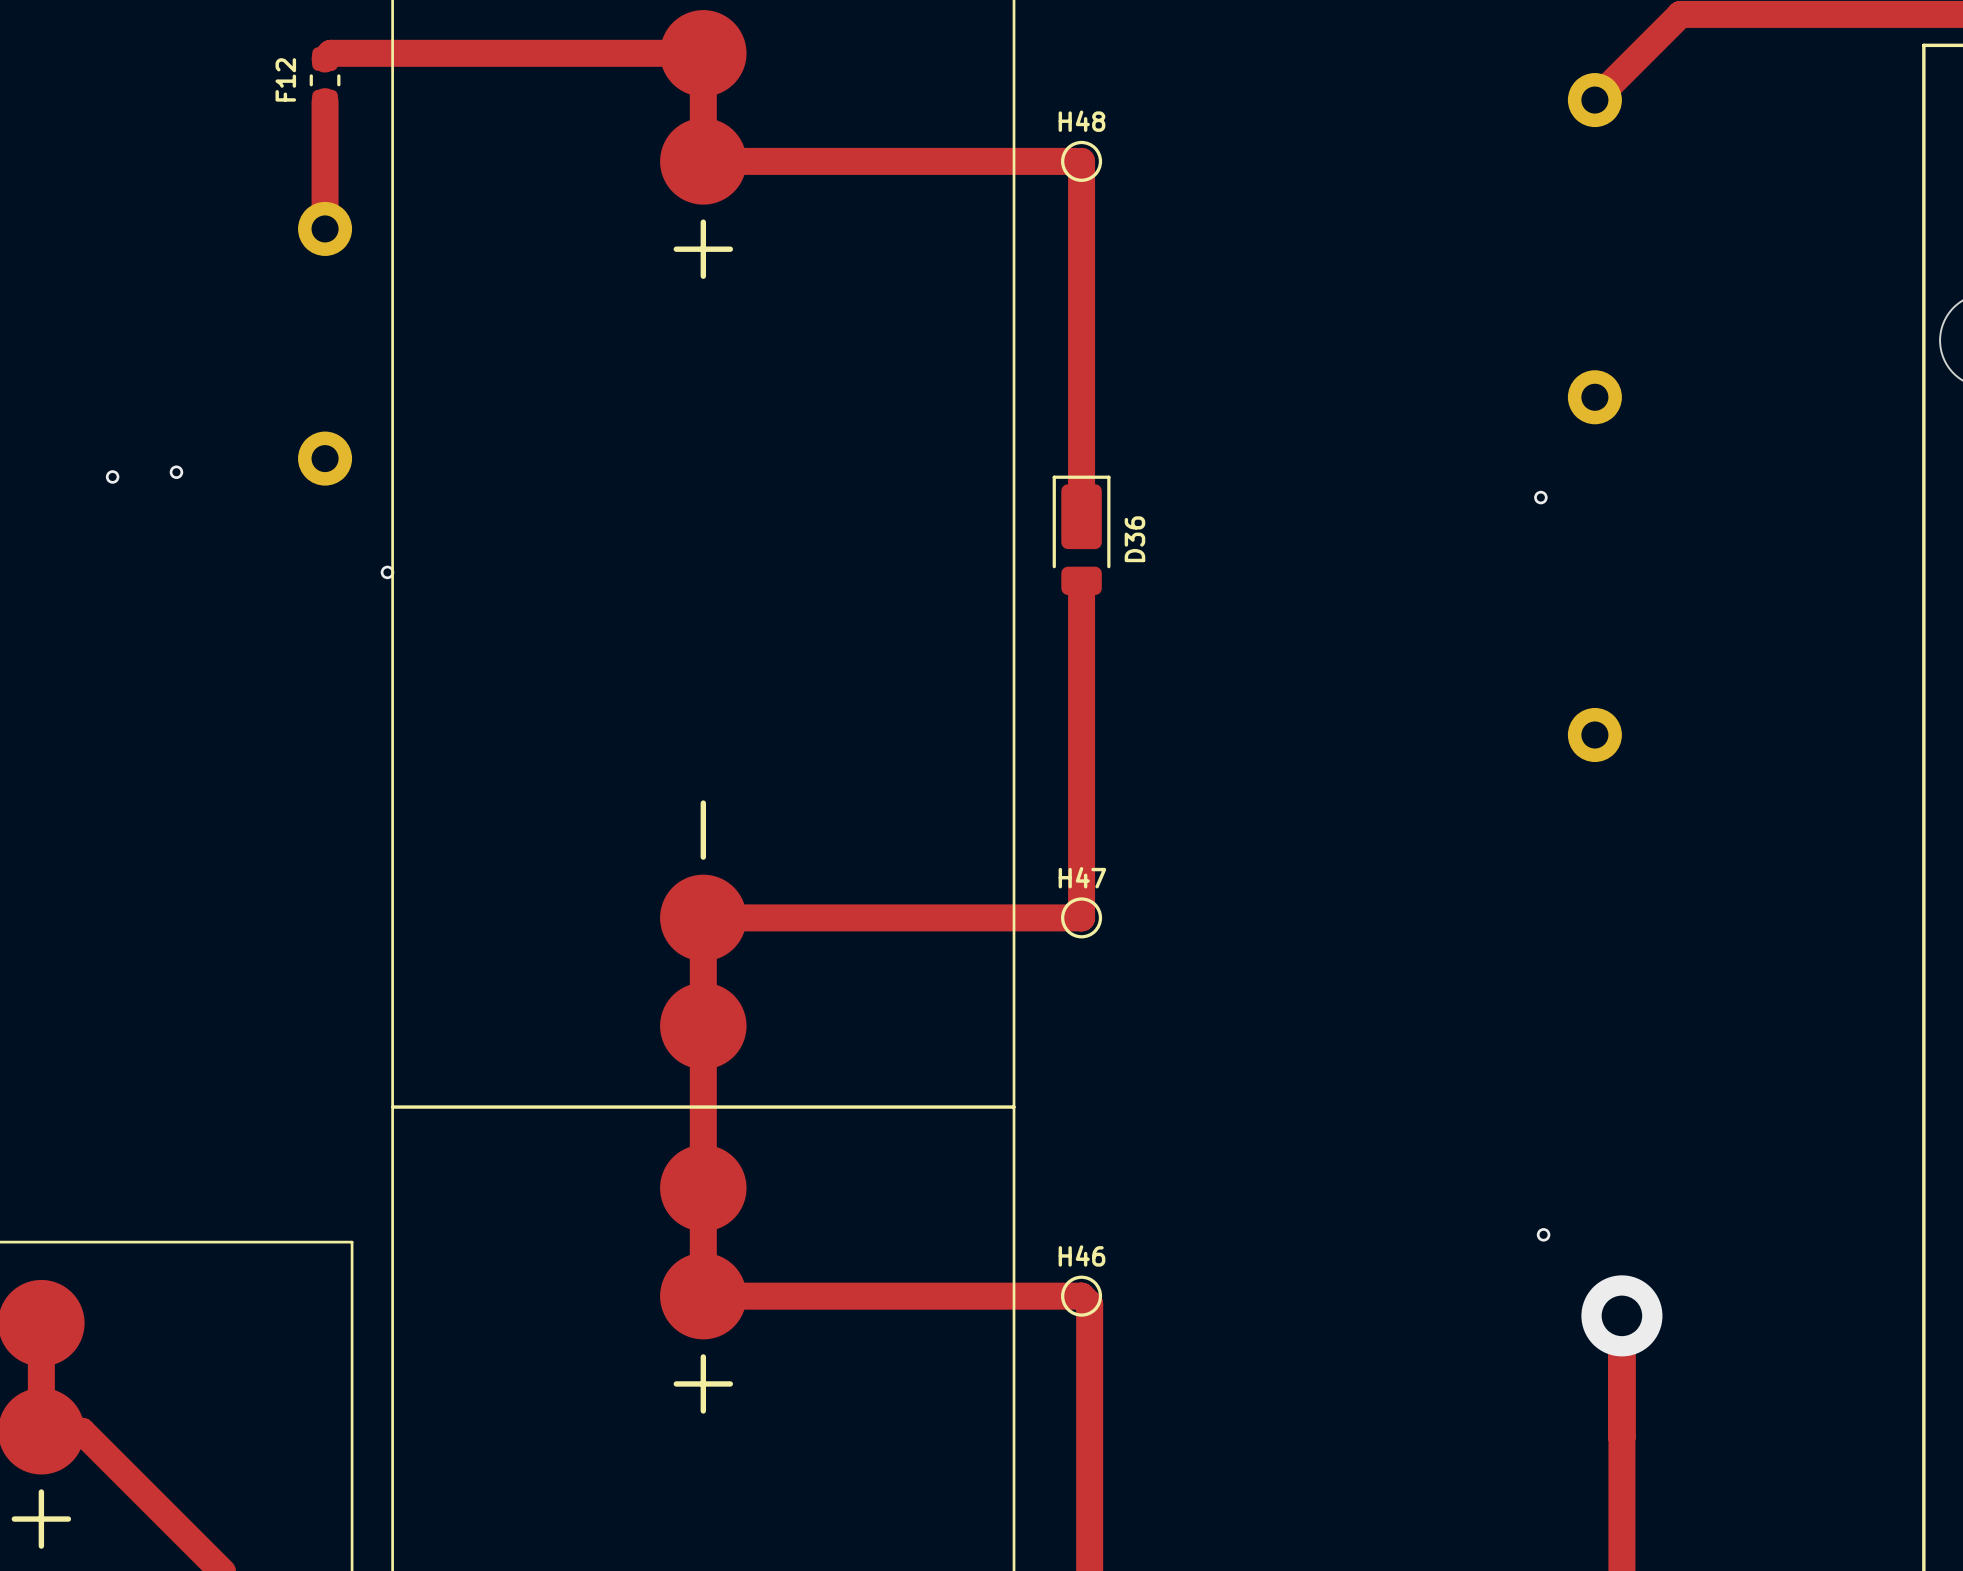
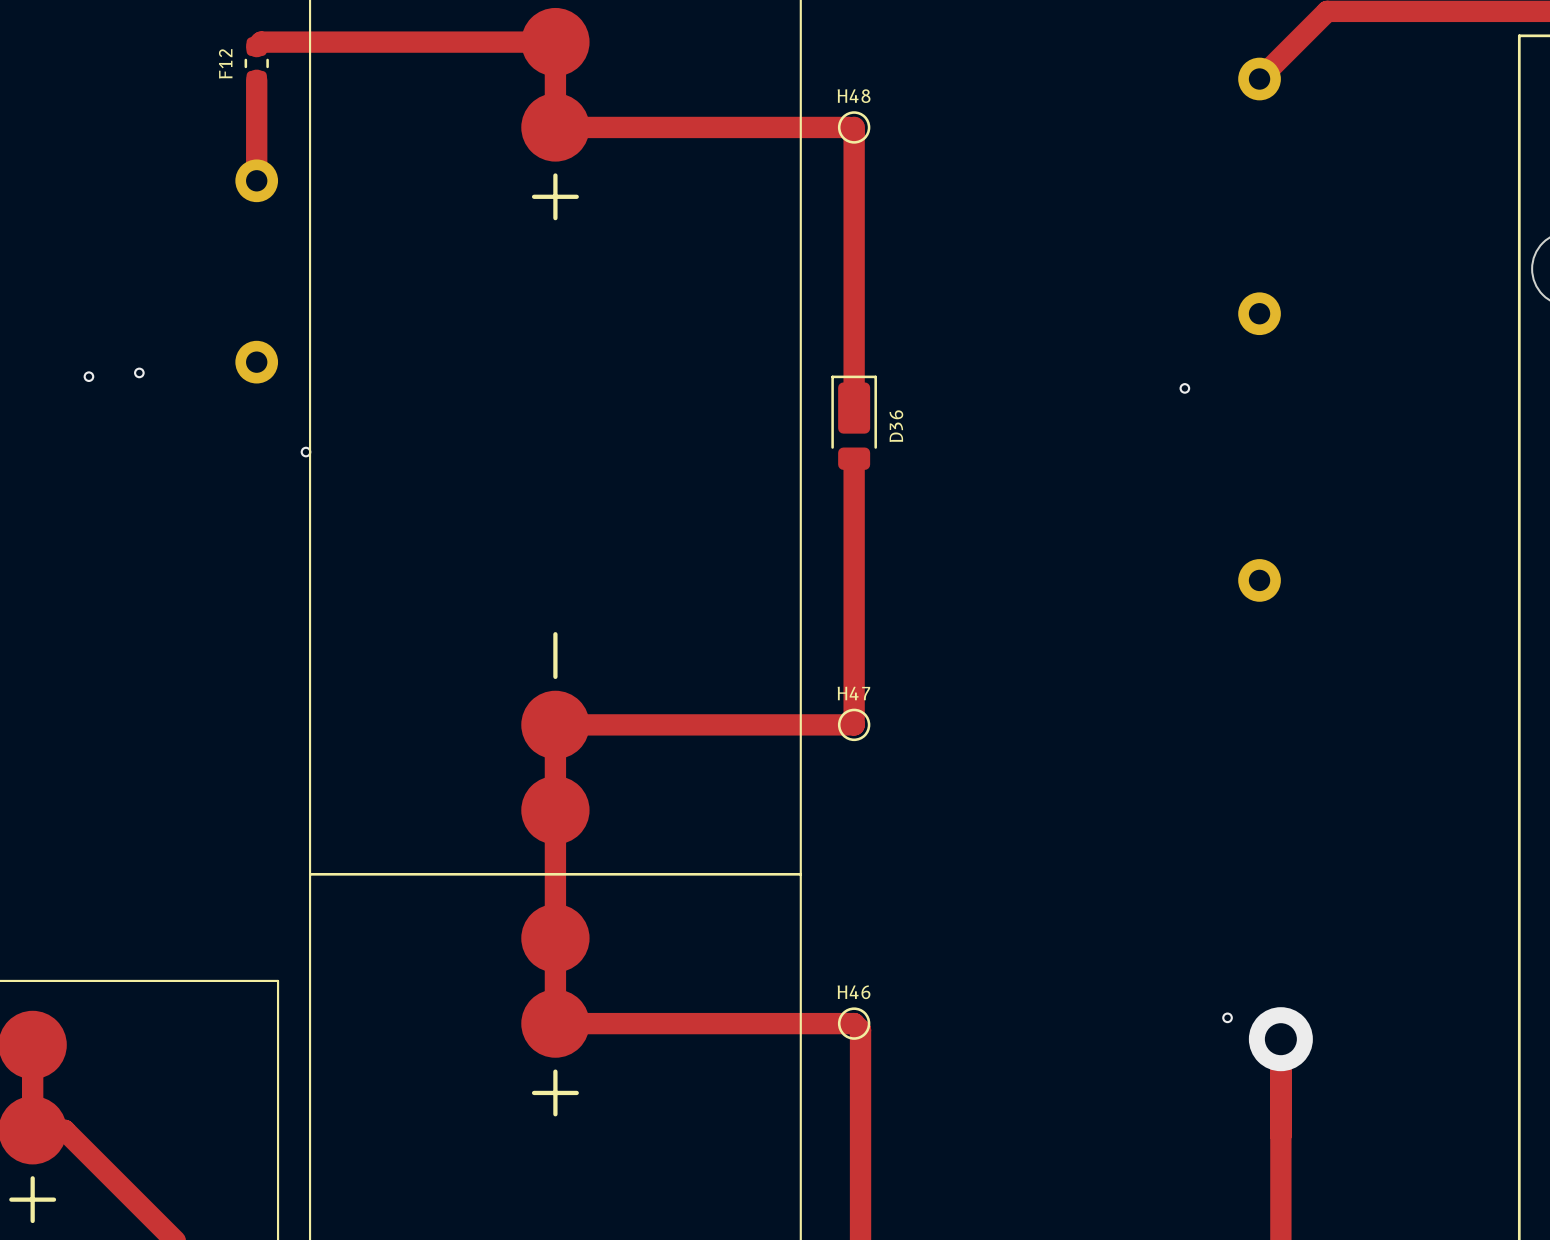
via position: (1540, 497) -> (1184, 388)
via position: (1543, 1234) -> (1227, 1017)

